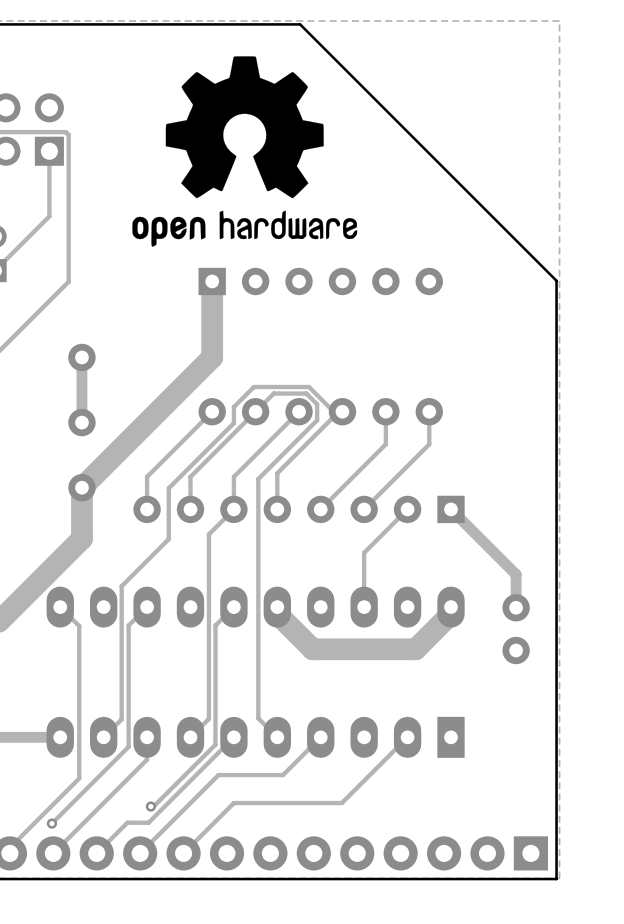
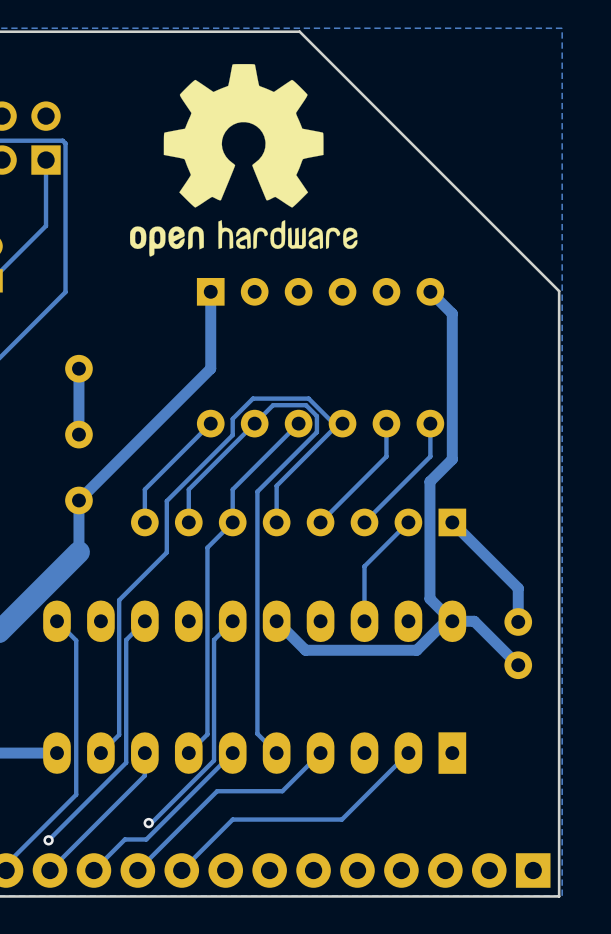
track width: thick (212, 281) (212, 357) (81, 487) (81, 538) -> thin (210, 291) (210, 368) (78, 500) (78, 552)
track: none -> (430, 291) (452, 313) (452, 459) (429, 481) (429, 598) (449, 618) (416, 650) (305, 650) (276, 621)
track: (450, 607) (450, 613) (415, 649) (312, 649) (277, 613) (277, 607) -> (452, 621) (474, 621) (518, 665)

